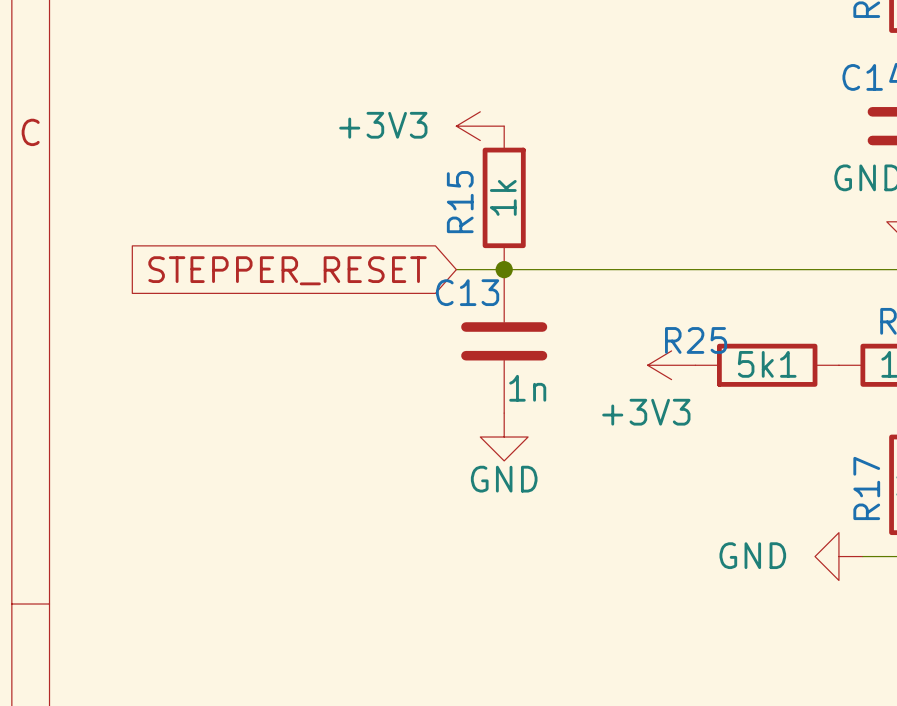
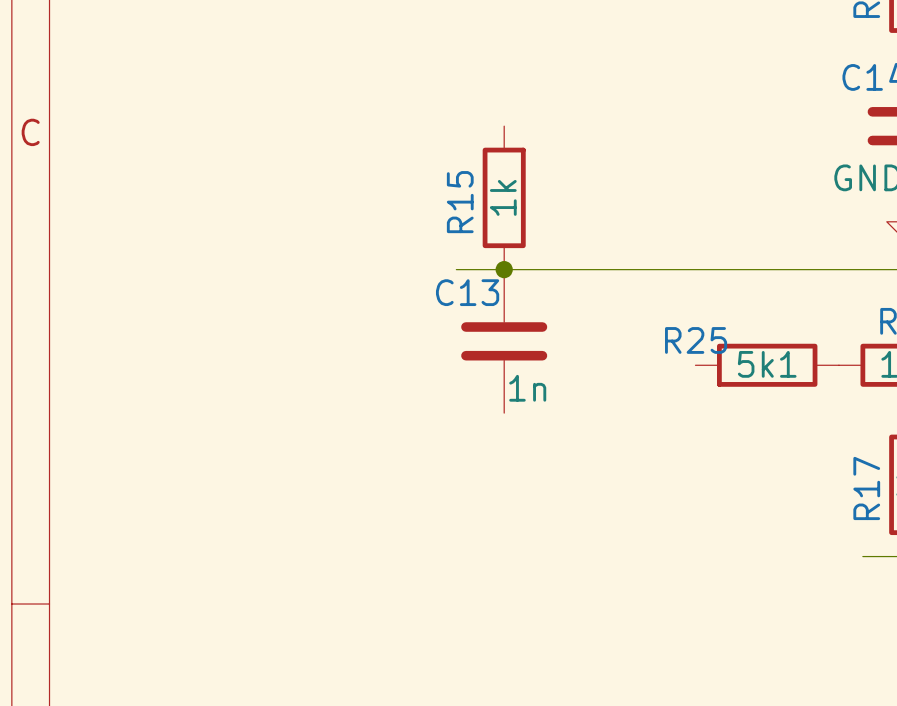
power symbol: +3V3 (480, 126) -> none
global label: STEPPER_RESET (287, 270) -> none
power symbol: +3V3 (671, 365) -> none
power symbol: GND (504, 437) -> none
power symbol: GND (838, 556) -> none

